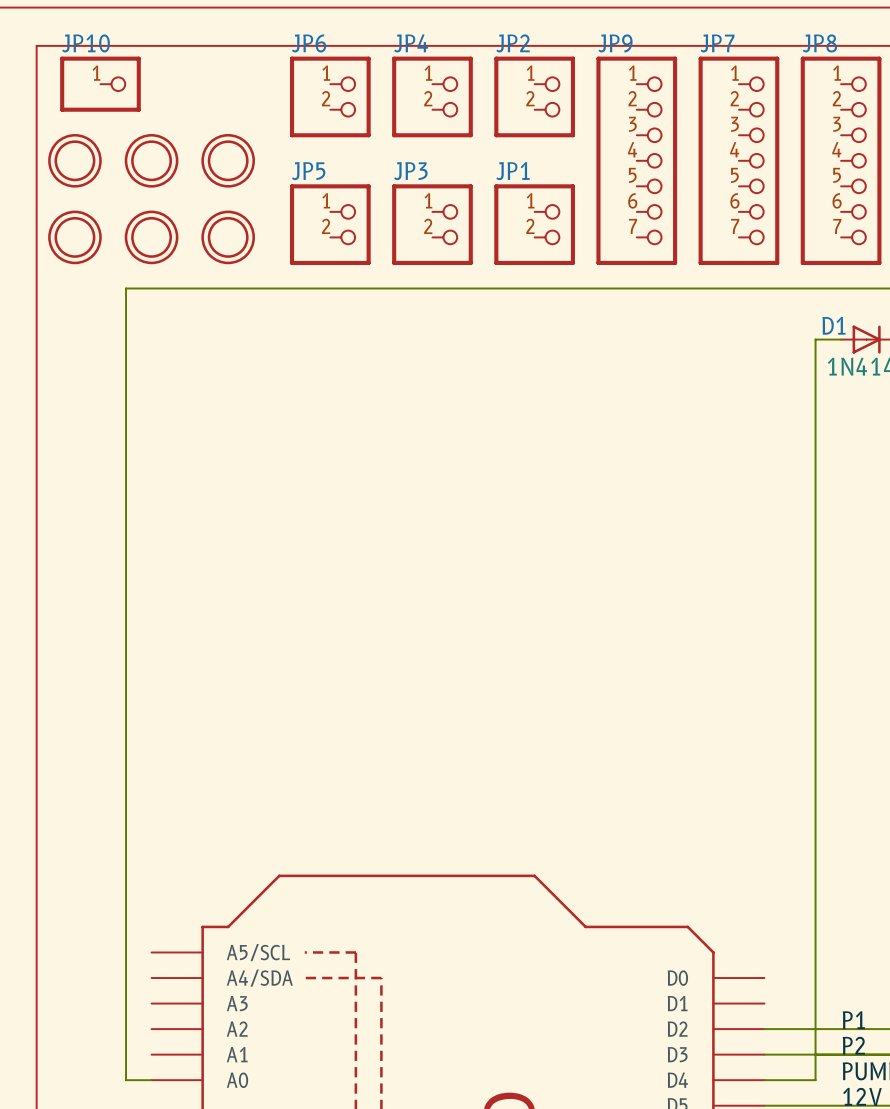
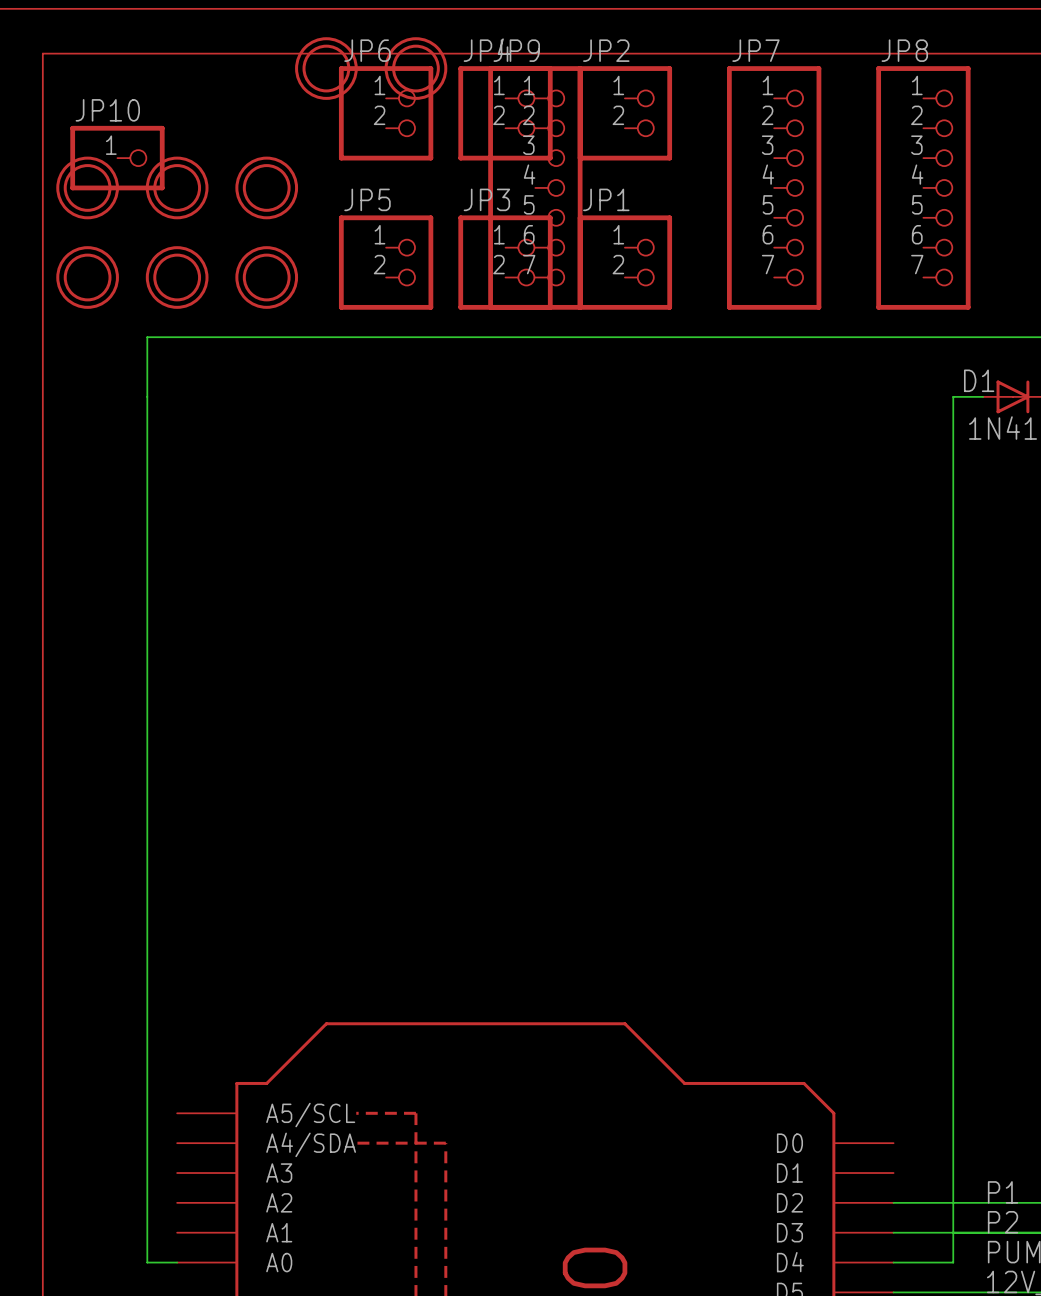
part: none -> (326, 68)
part: none -> (415, 68)
JP10 position: (100, 84) -> (117, 158)
JP9 position: (636, 160) -> (535, 187)
JP7 position: (738, 160) -> (774, 187)
JP8 position: (841, 160) -> (923, 187)

